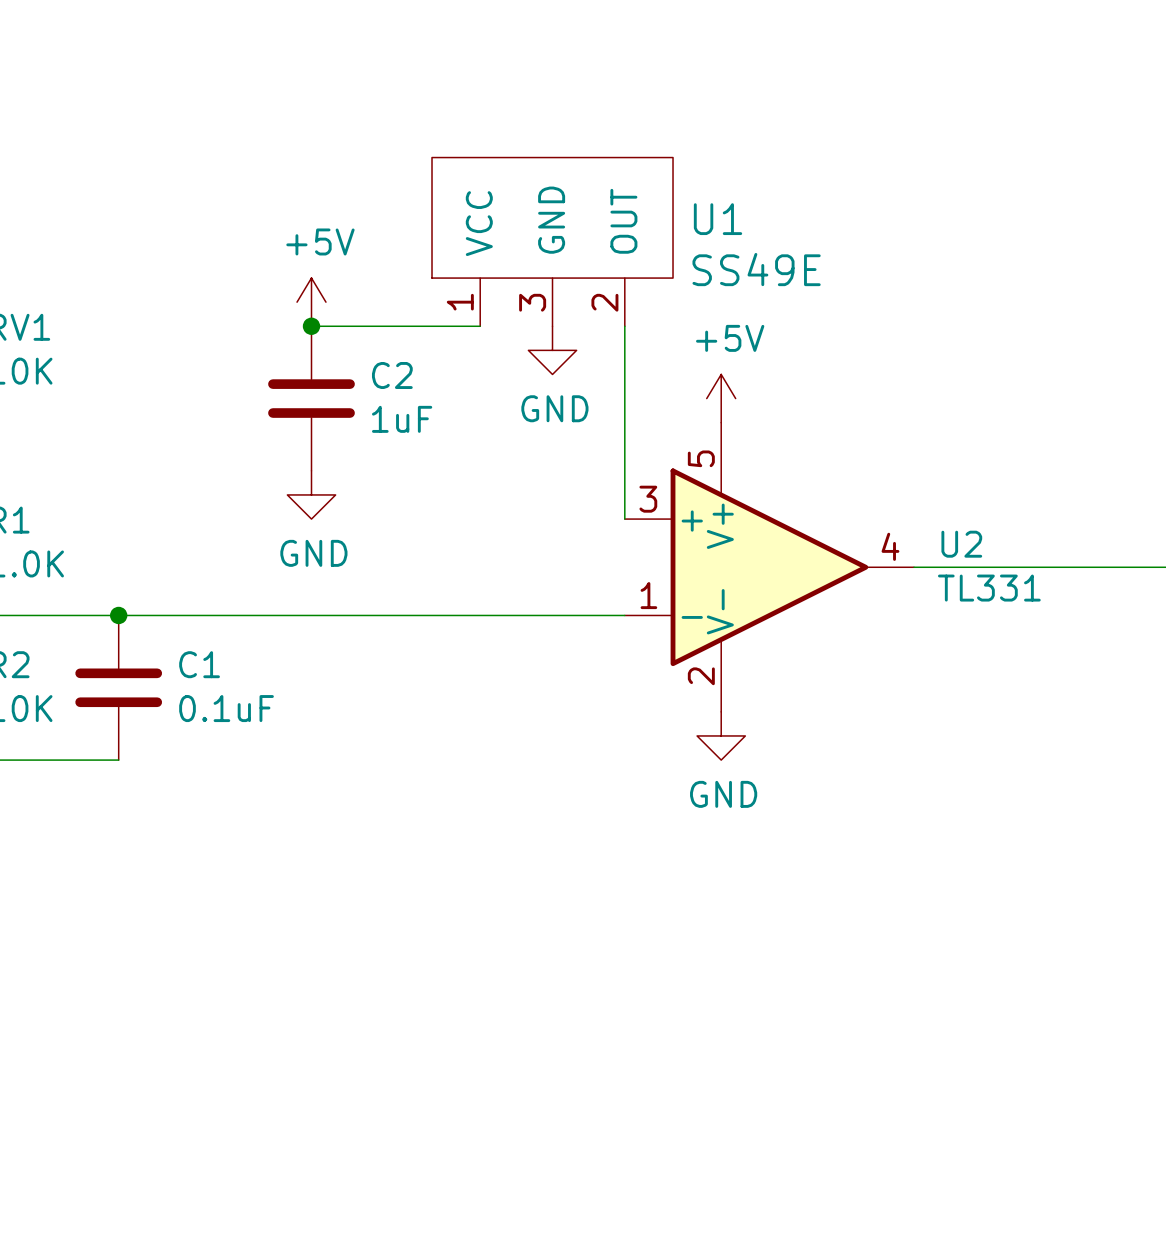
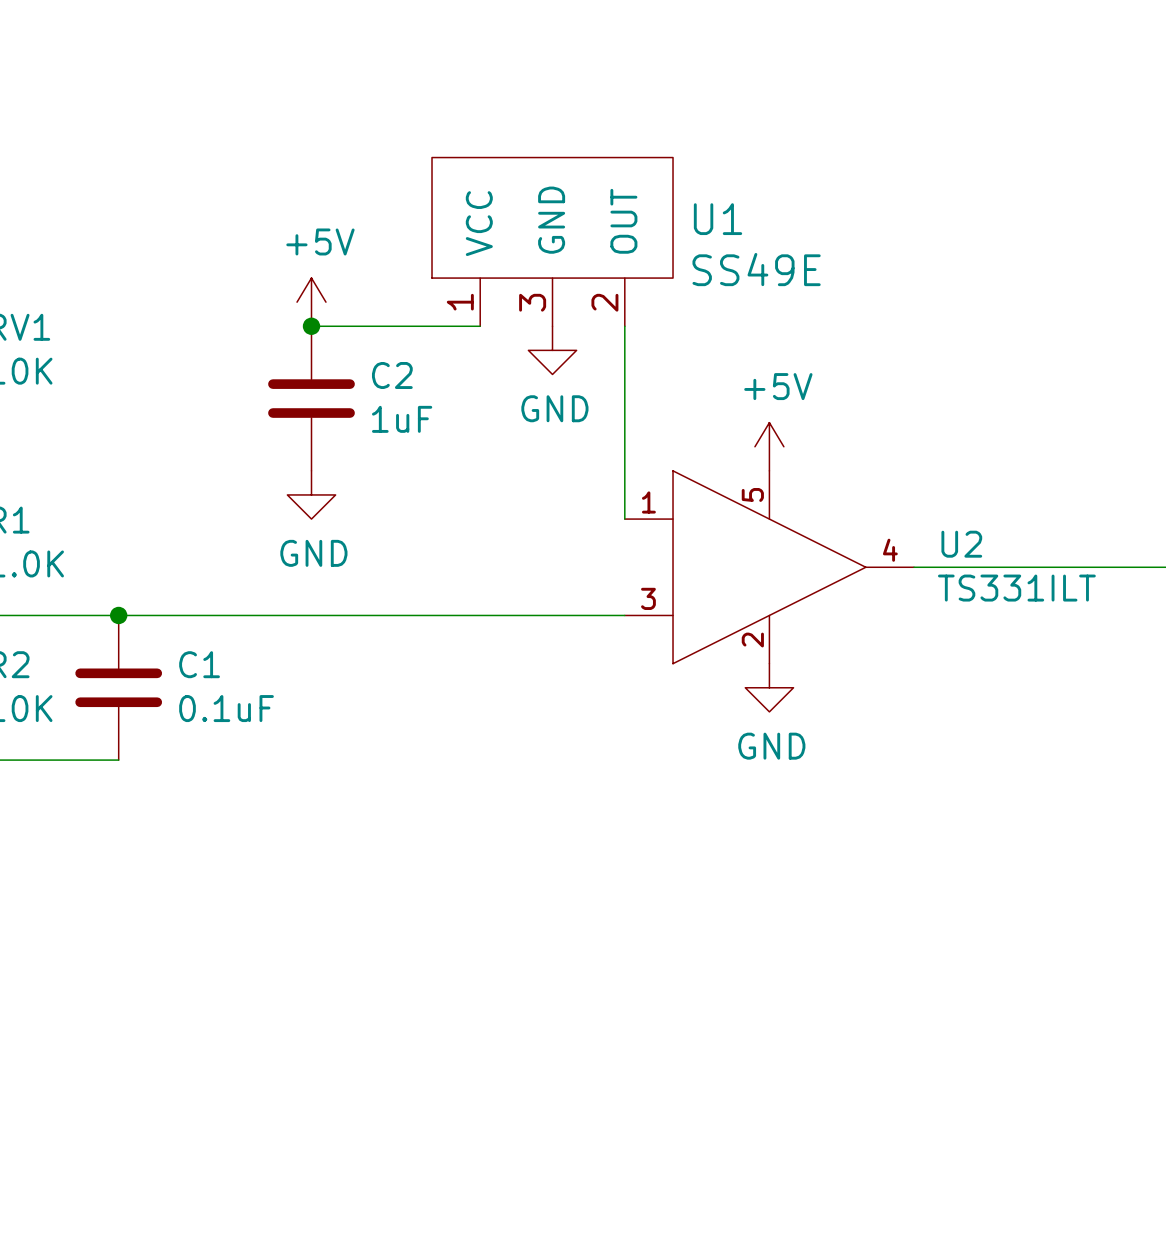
power symbol position: +5V (721, 398) -> +5V (769, 446)
U2 symbol: [624, 422, 915, 712] -> [624, 470, 915, 664]
U2 value: TL331 (989, 588) -> TS331ILT (1016, 588)
power symbol position: GND (721, 735) -> GND (769, 687)

